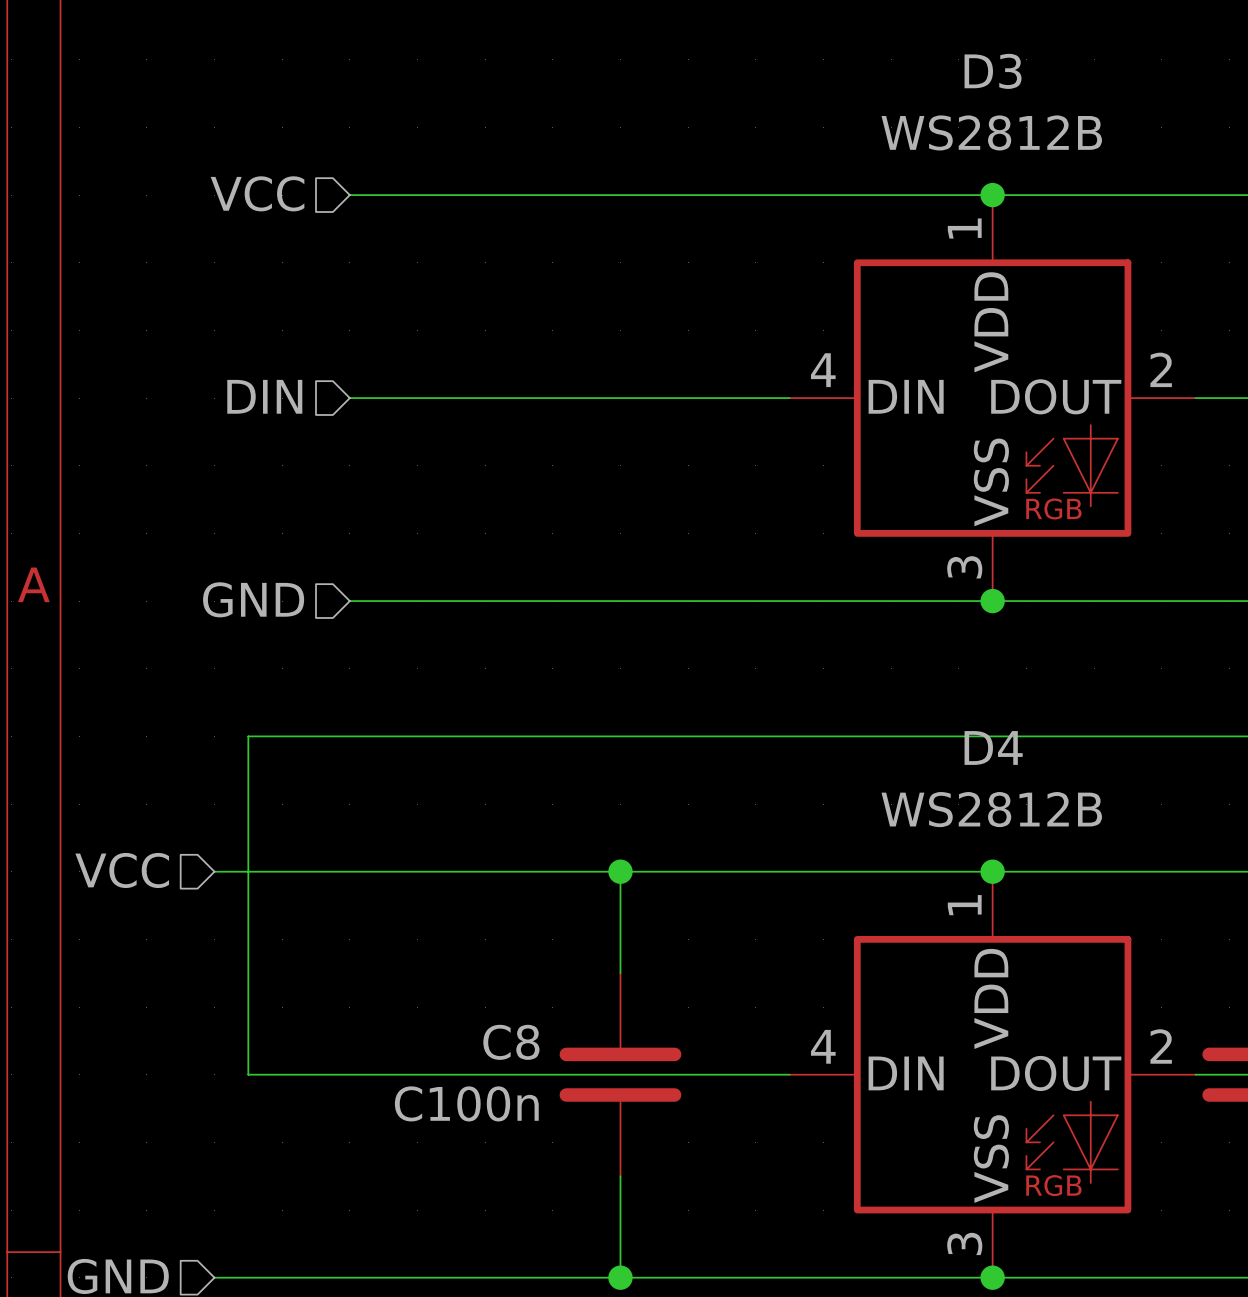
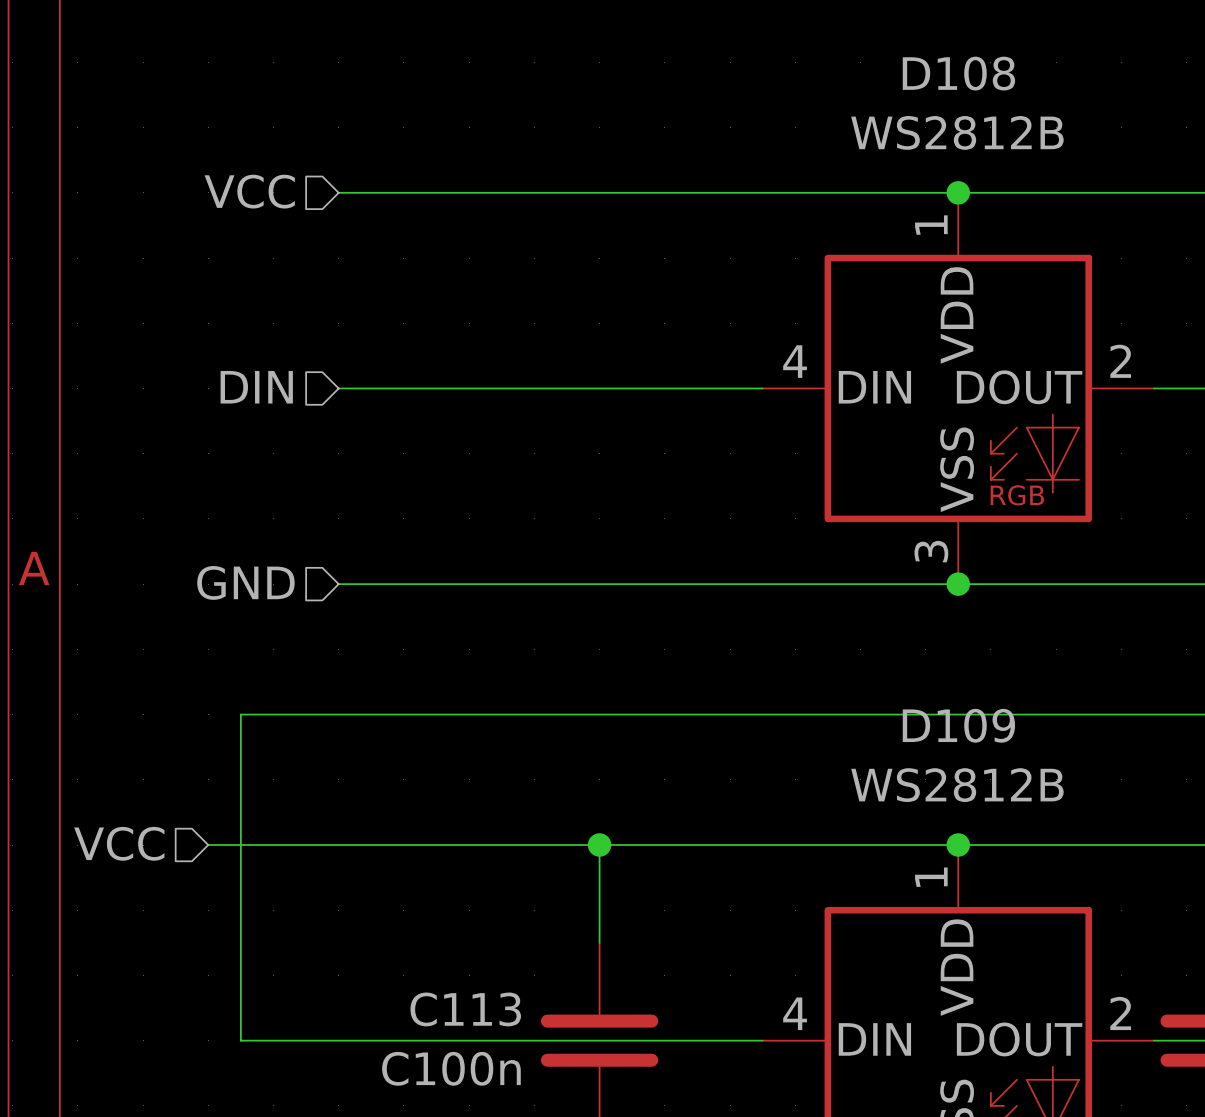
D3 name: D3 (993, 71) -> D108 (958, 73)
D4 name: D4 (993, 747) -> D109 (958, 725)
C8 name: C8 (511, 1042) -> C113 (465, 1009)

